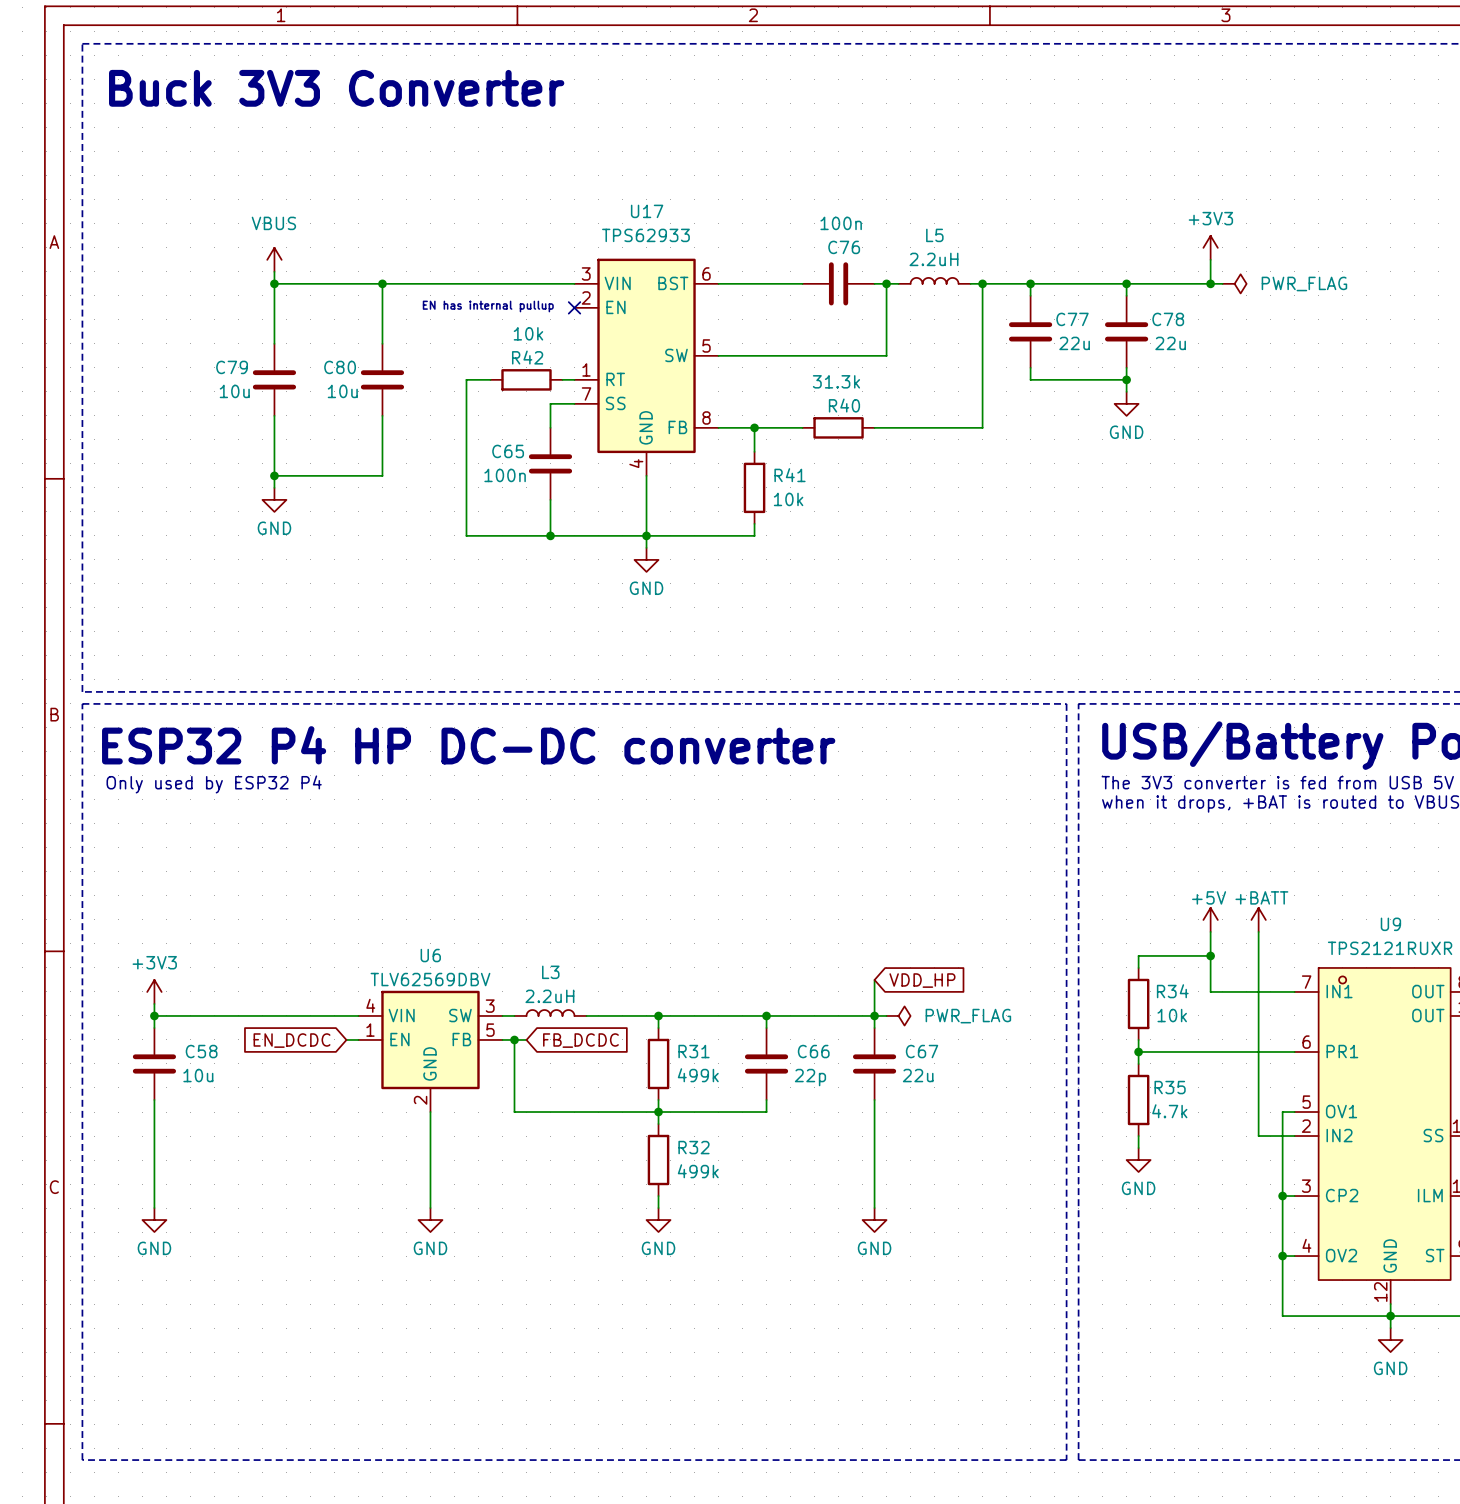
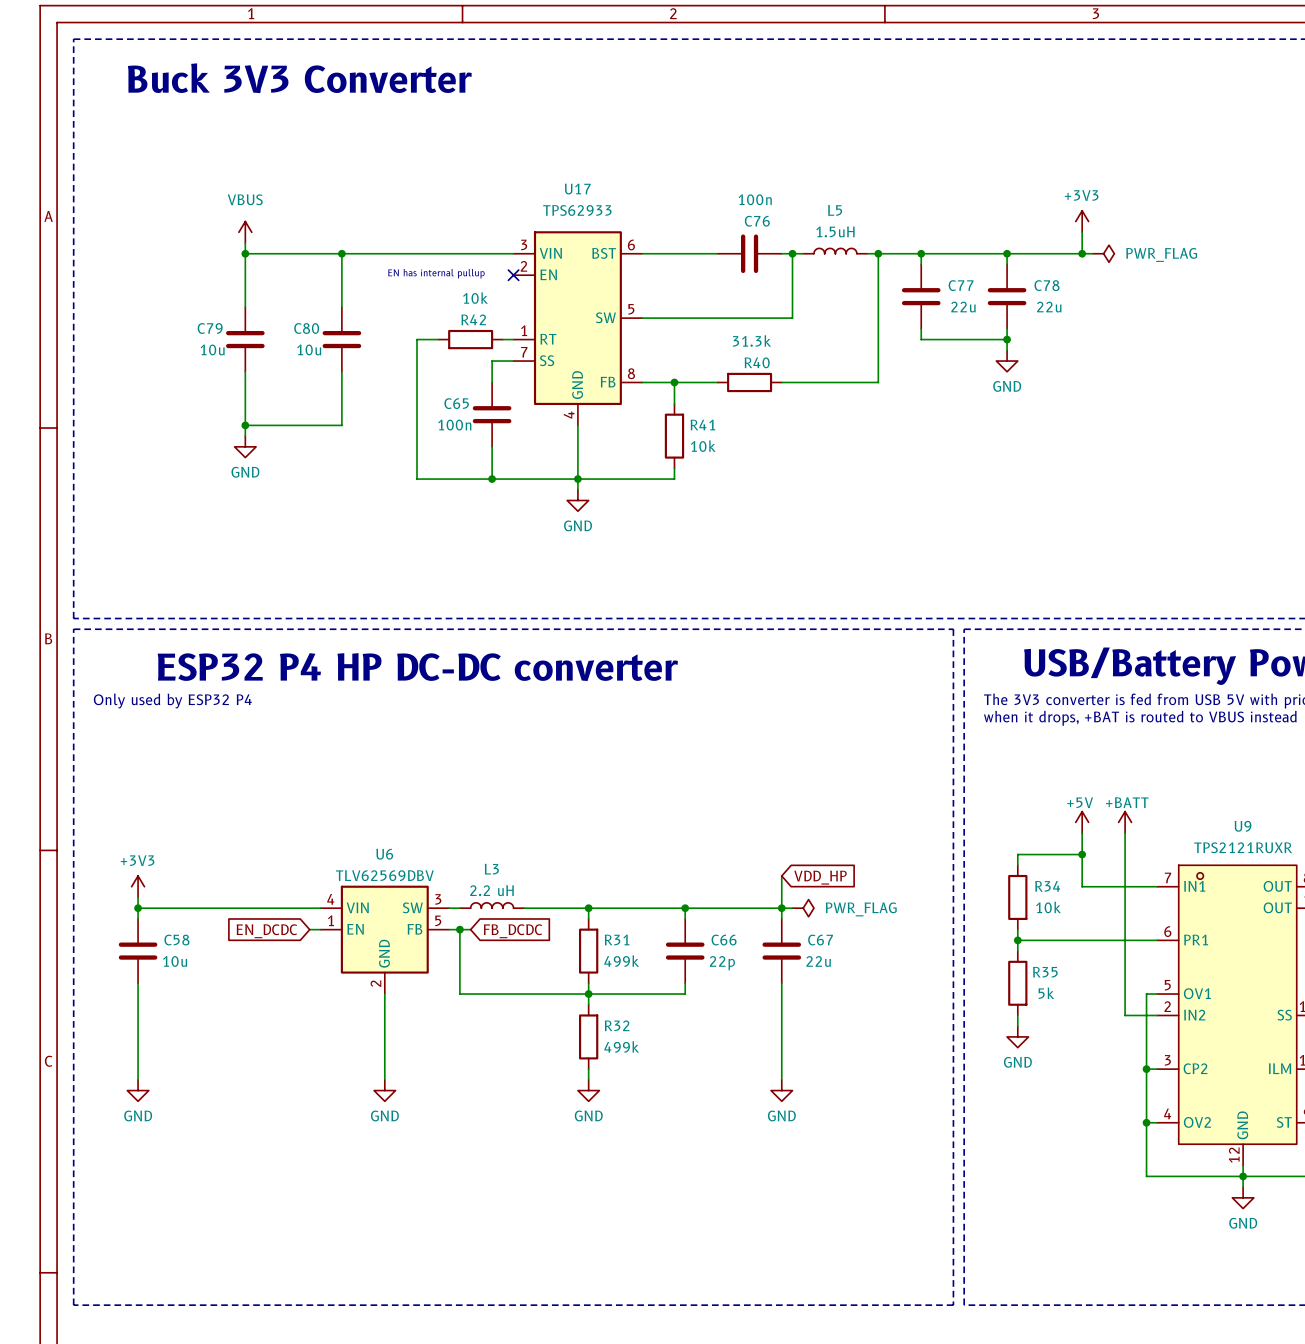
L5 value: 2.2uH (933, 259) -> 1.5uH (835, 231)
L3 value: 2.2uH (549, 996) -> 2.2 uH (491, 890)
R35 value: 4.7k (1169, 1111) -> 5k (1046, 993)

